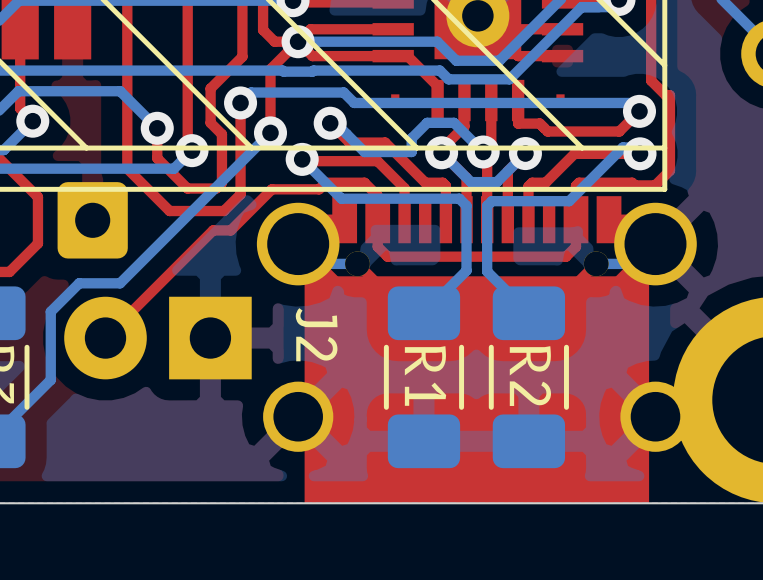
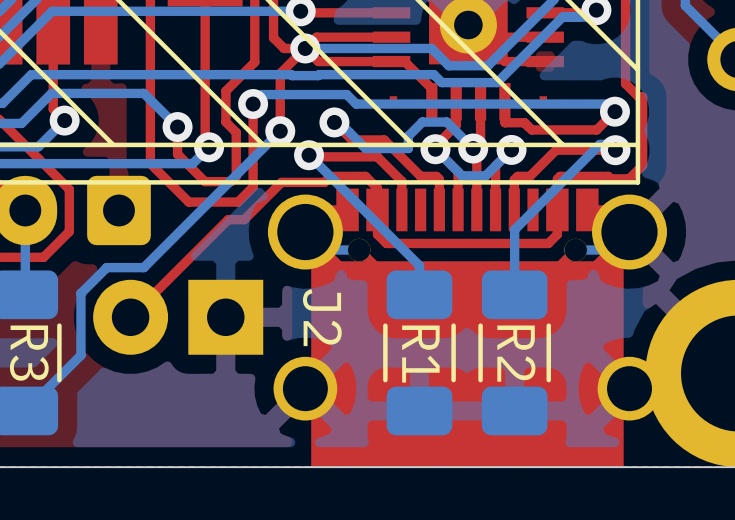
bottom track: (341, 198) (459, 198) (466, 205) (466, 270) (423, 313) -> (344, 190) (419, 265) (419, 294)
bottom track: (569, 201) (491, 201) (487, 205) (487, 271) (528, 313) -> (551, 193) (514, 229) (514, 294)

